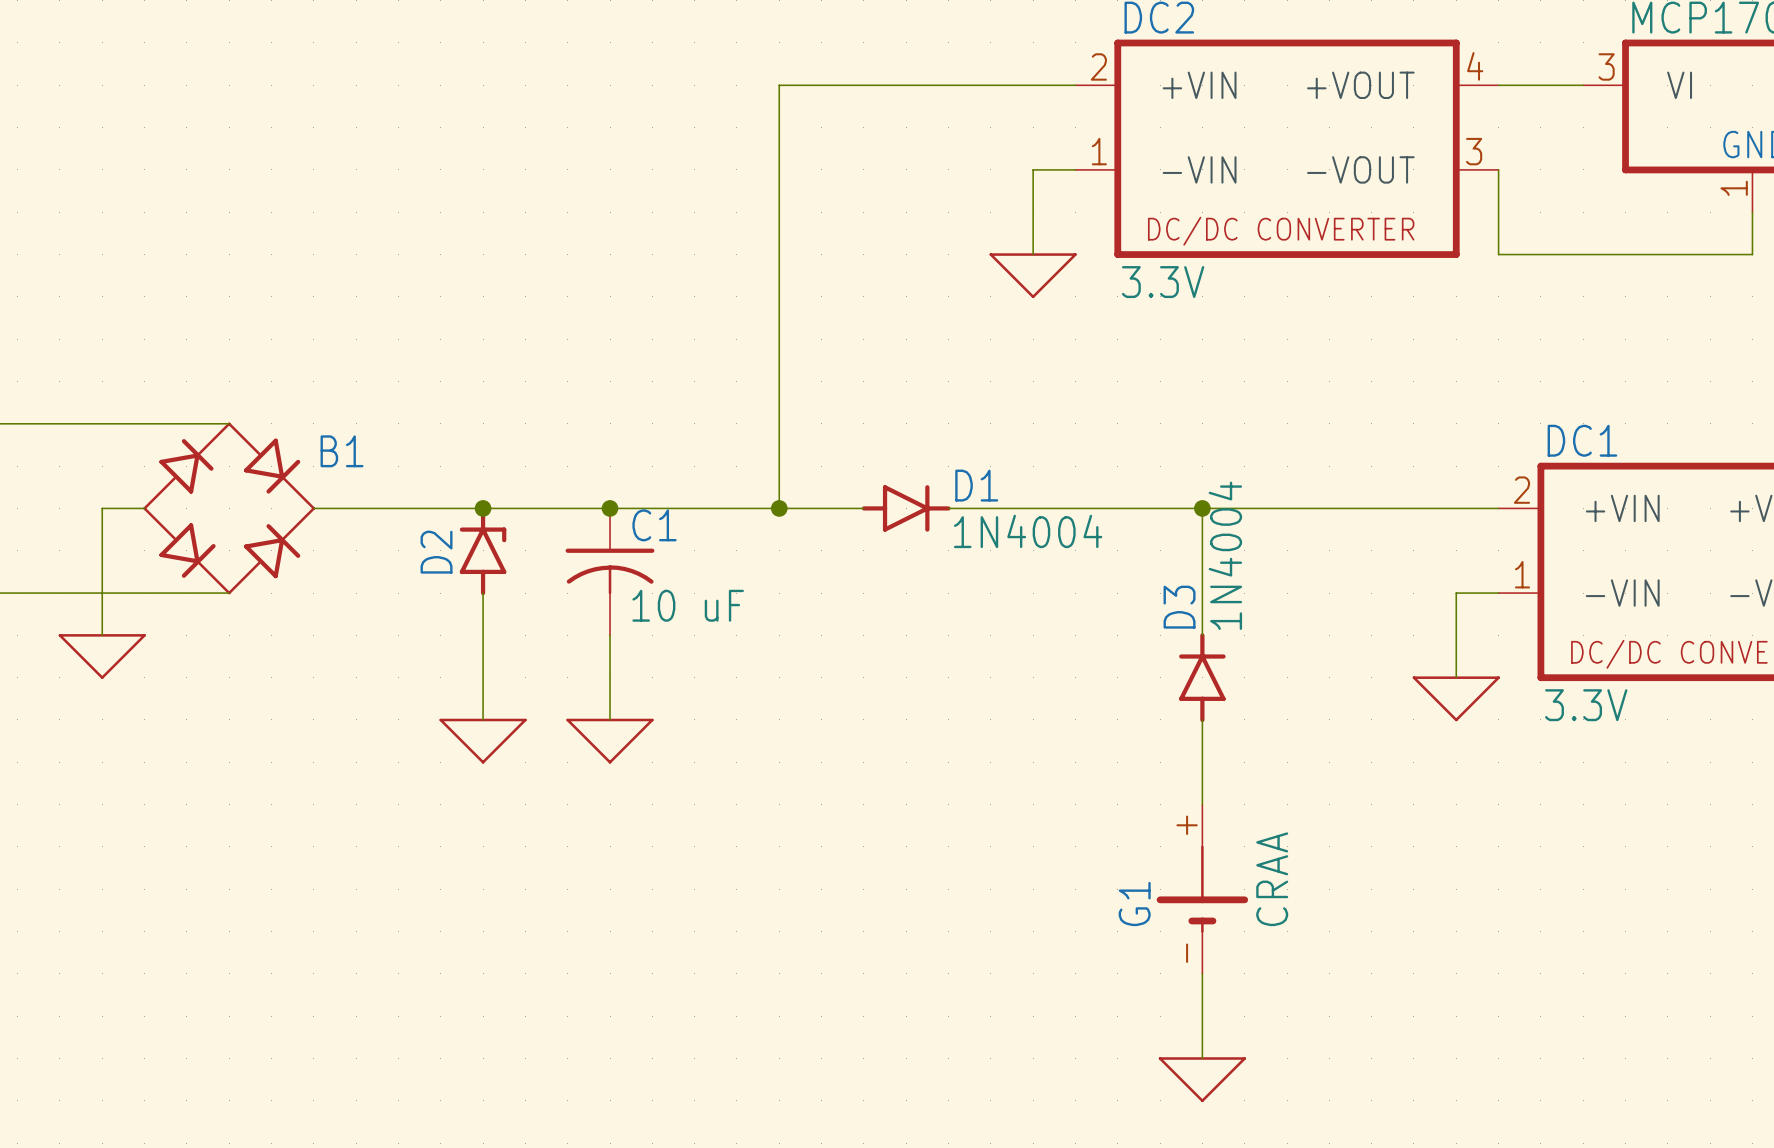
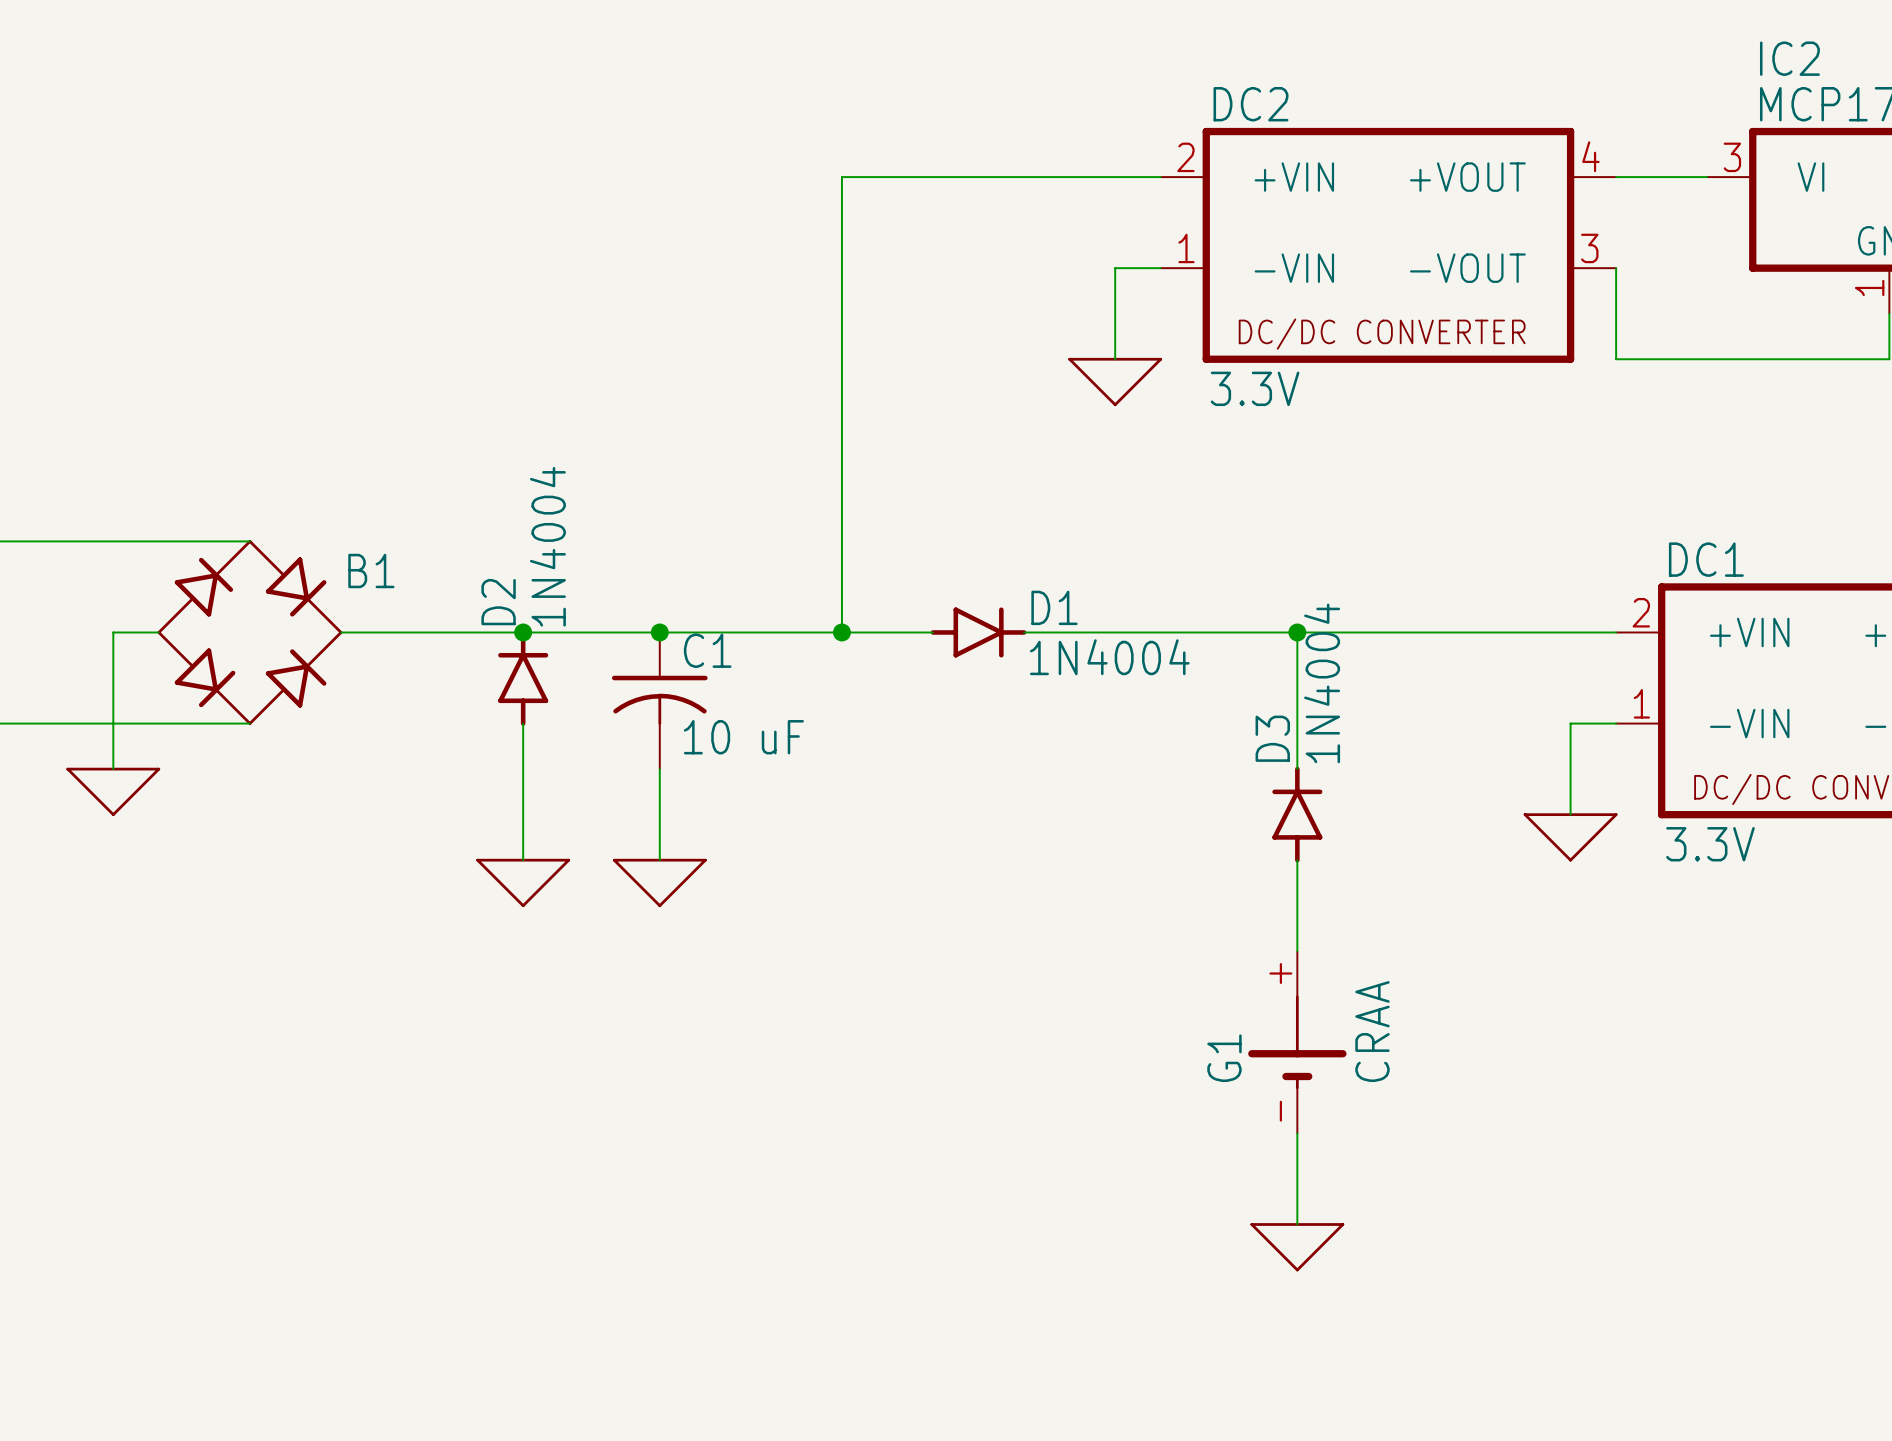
D2 value: none -> 1N4004 (547, 546)
D2 symbol: [459, 506, 507, 596] -> [498, 630, 549, 726]
D2 name position: D2 (436, 552) -> D2 (498, 602)

